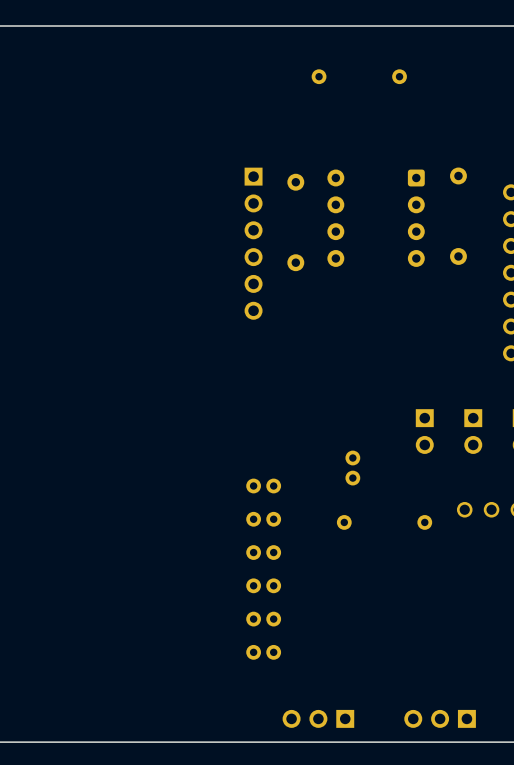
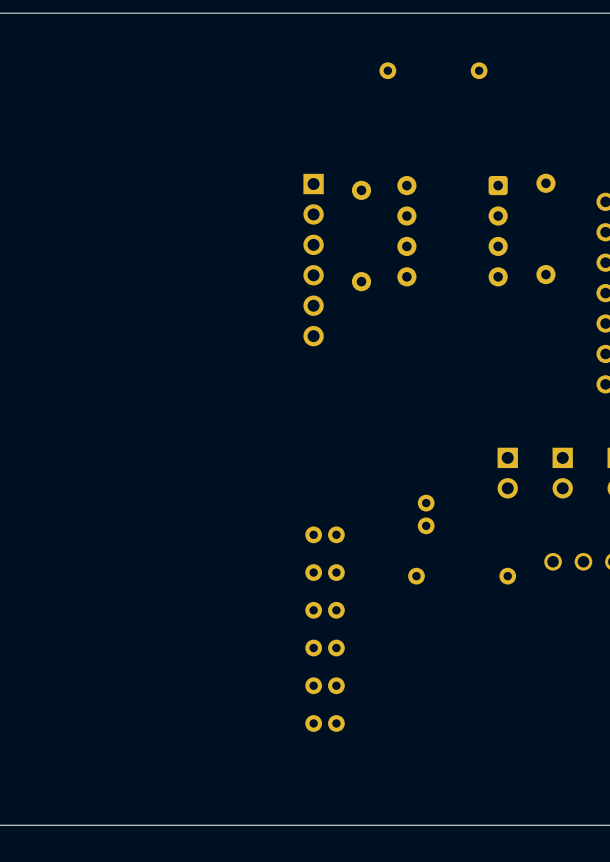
part: (318, 718) -> none
part: (440, 718) -> none

